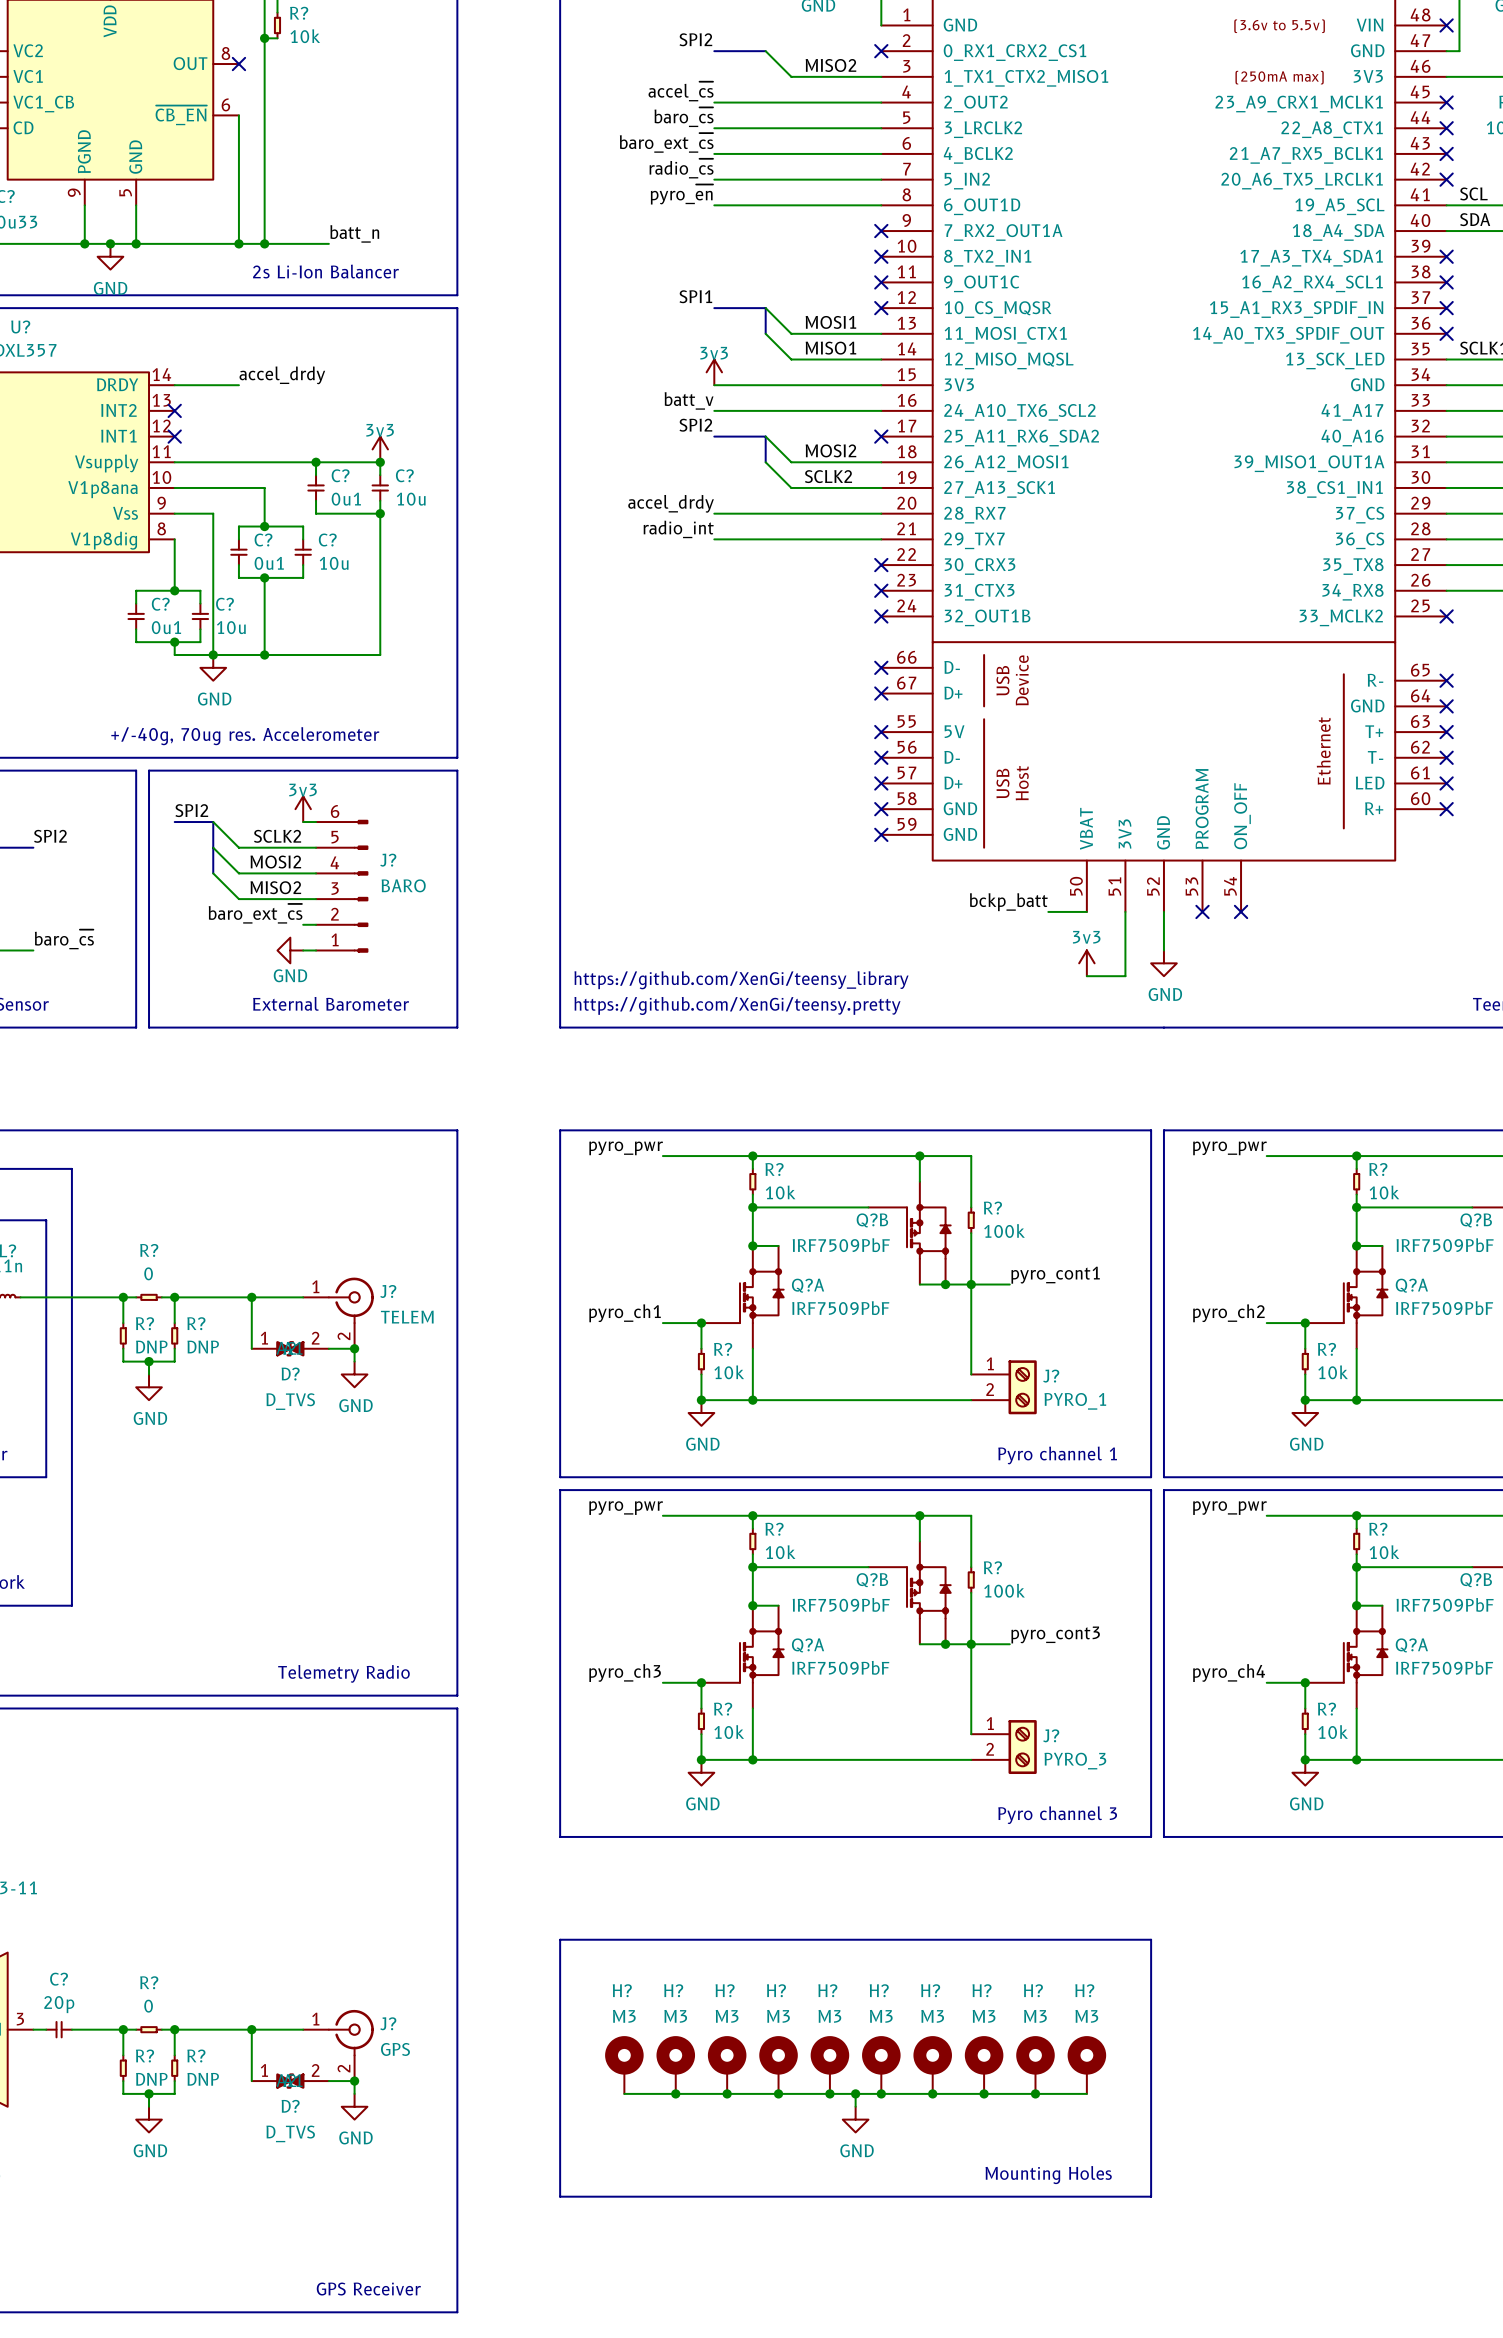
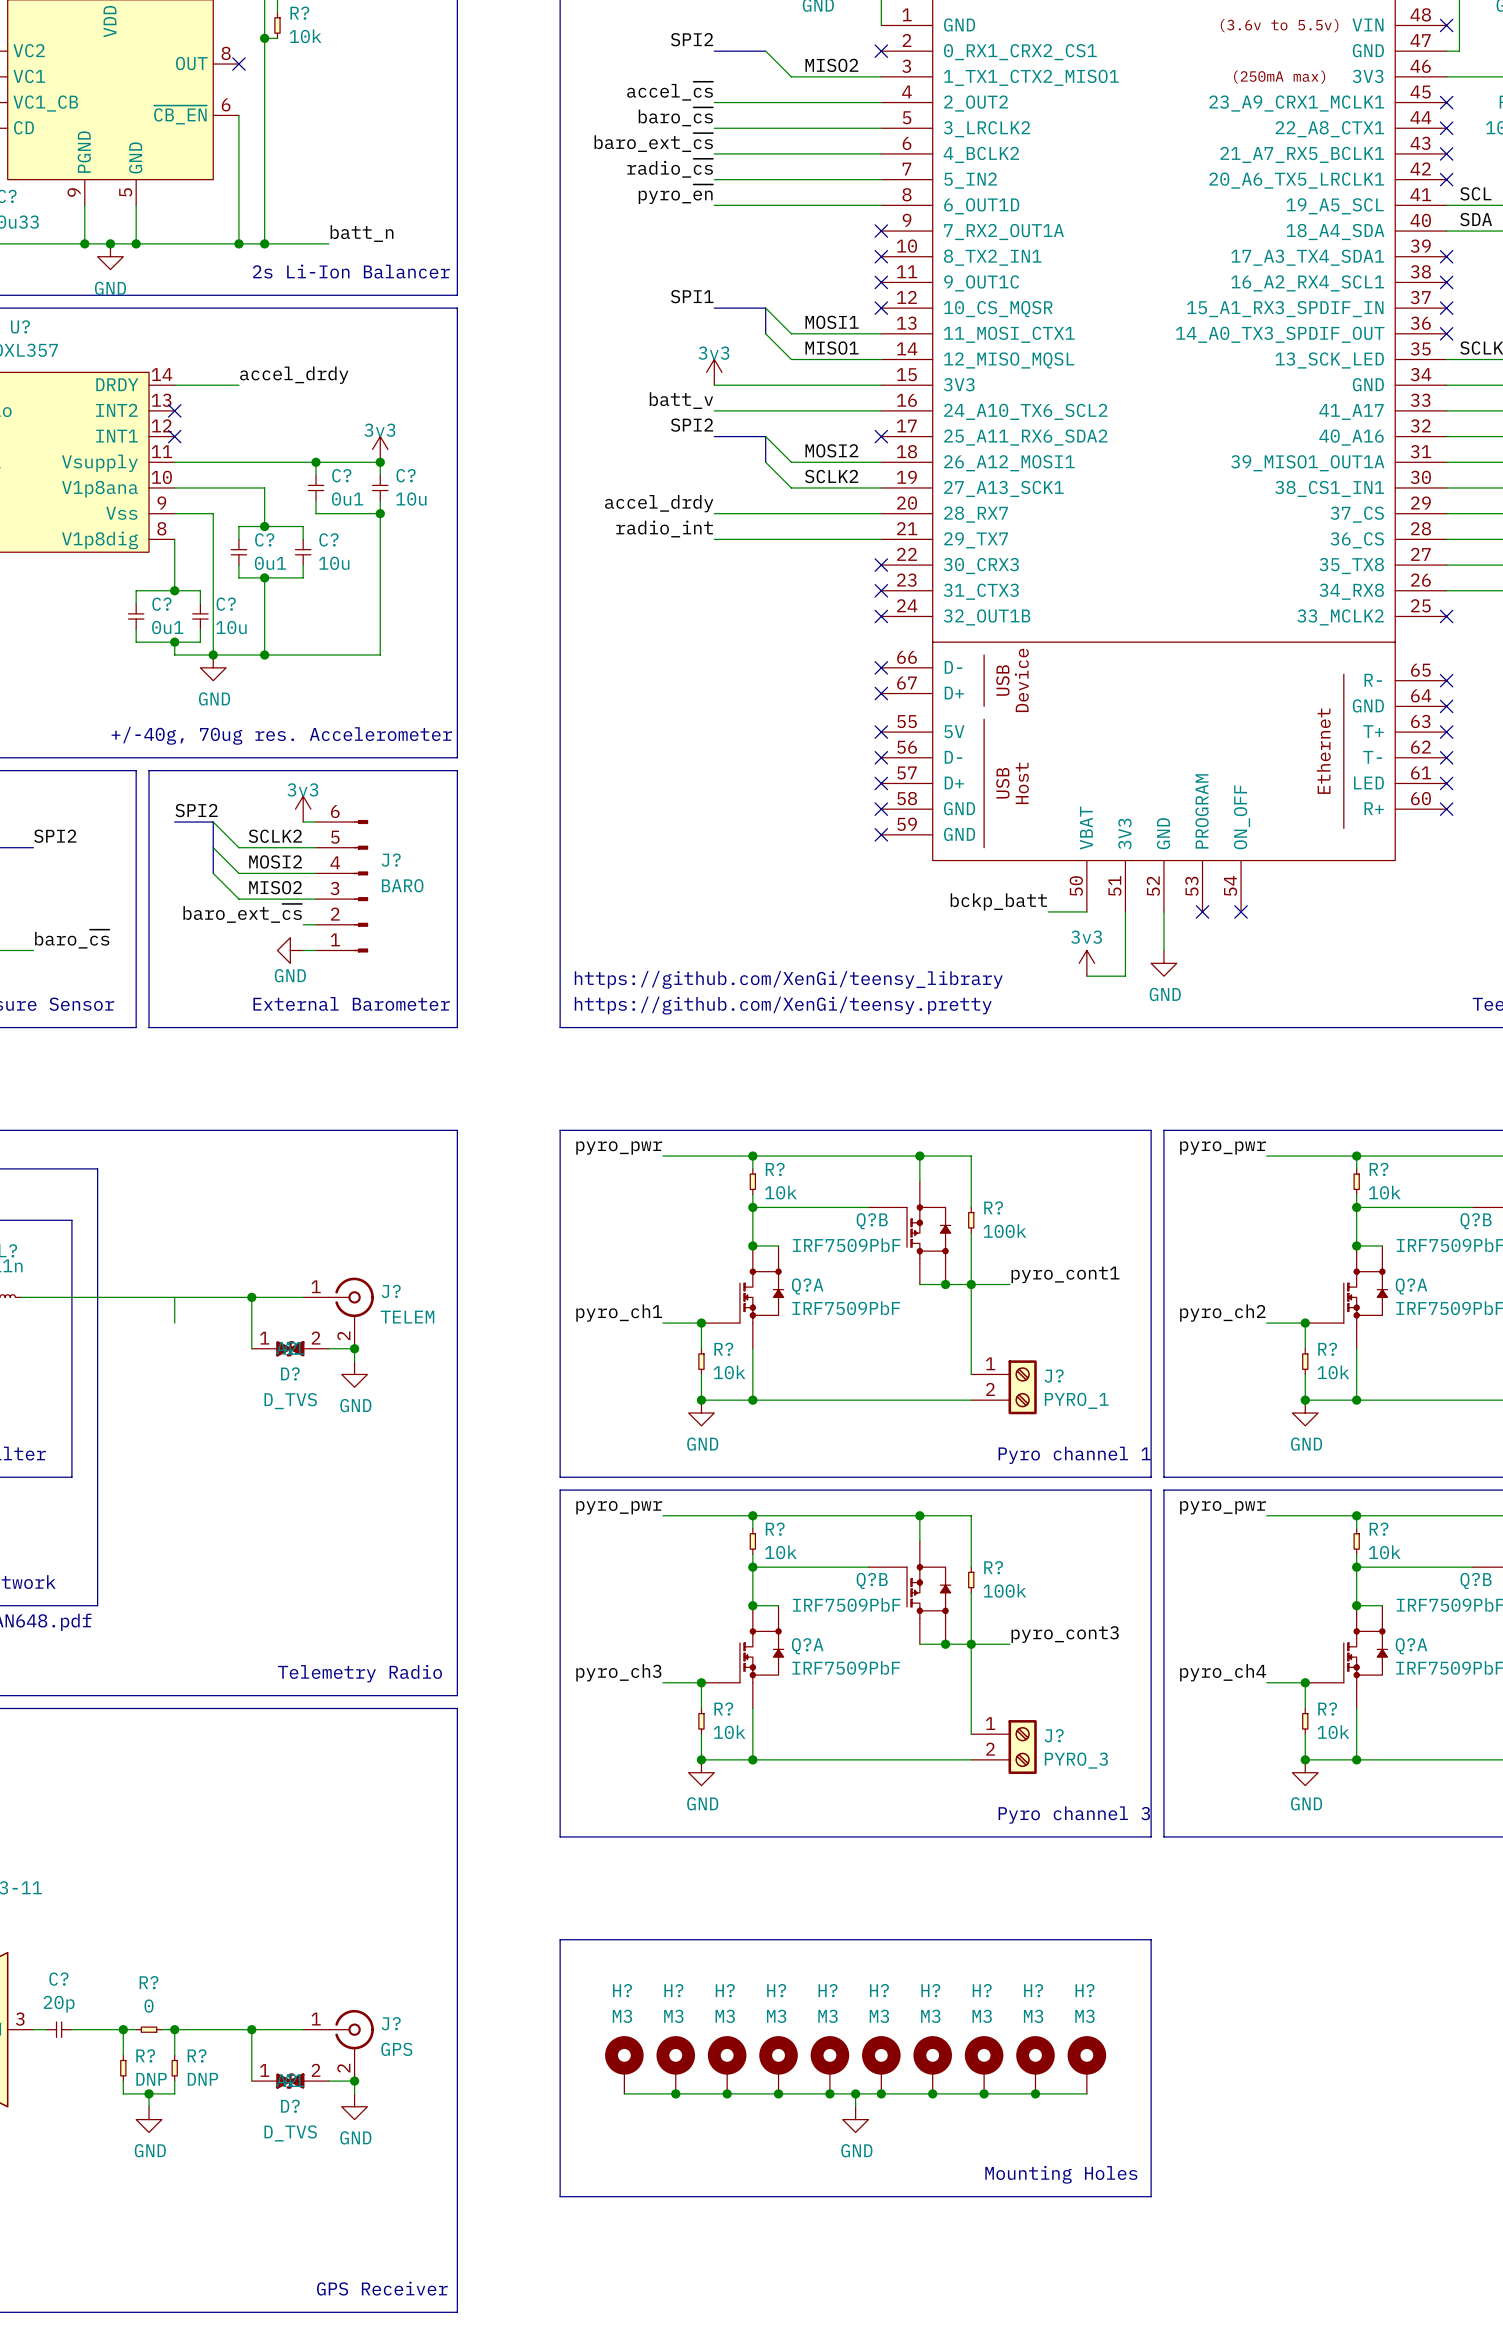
line: (71, 1168) (71, 1220) -> (46, 1220) (71, 1220)
line: none -> (71, 1168) (97, 1168) (97, 1605) (71, 1605)
line: (46, 1220) (46, 1477) -> none
wire: (123, 1297) (123, 1323) -> none
junction: (123, 1297) -> none
R?: 0 (149, 1297) -> none
junction: (174, 1297) -> none
R?: DNP (123, 1335) -> none
R?: DNP (174, 1335) -> none
wire: (123, 1348) (123, 1361) (174, 1361) (174, 1348) -> none
wire: (149, 1361) (149, 1374) -> none
junction: (149, 1361) -> none
power symbol: GND (149, 1387) -> none
line: (71, 1477) (71, 1605) -> (71, 1477) (46, 1477)

